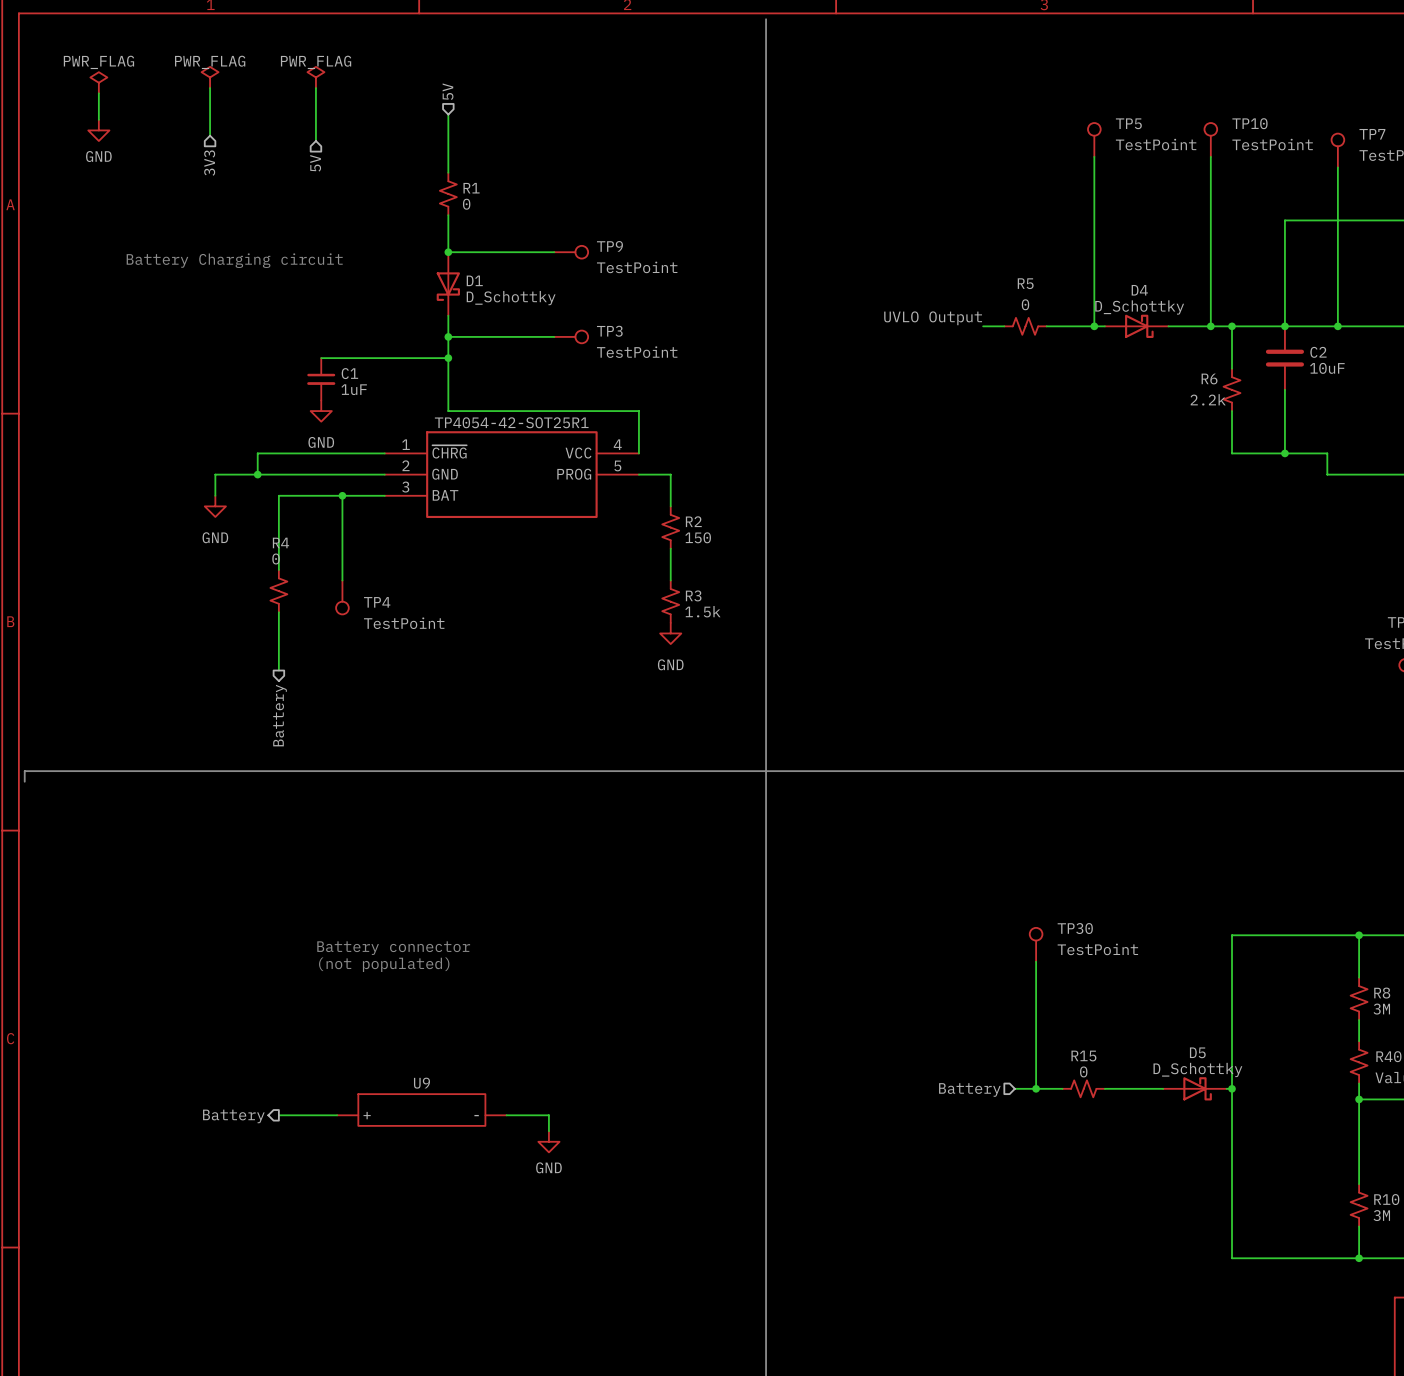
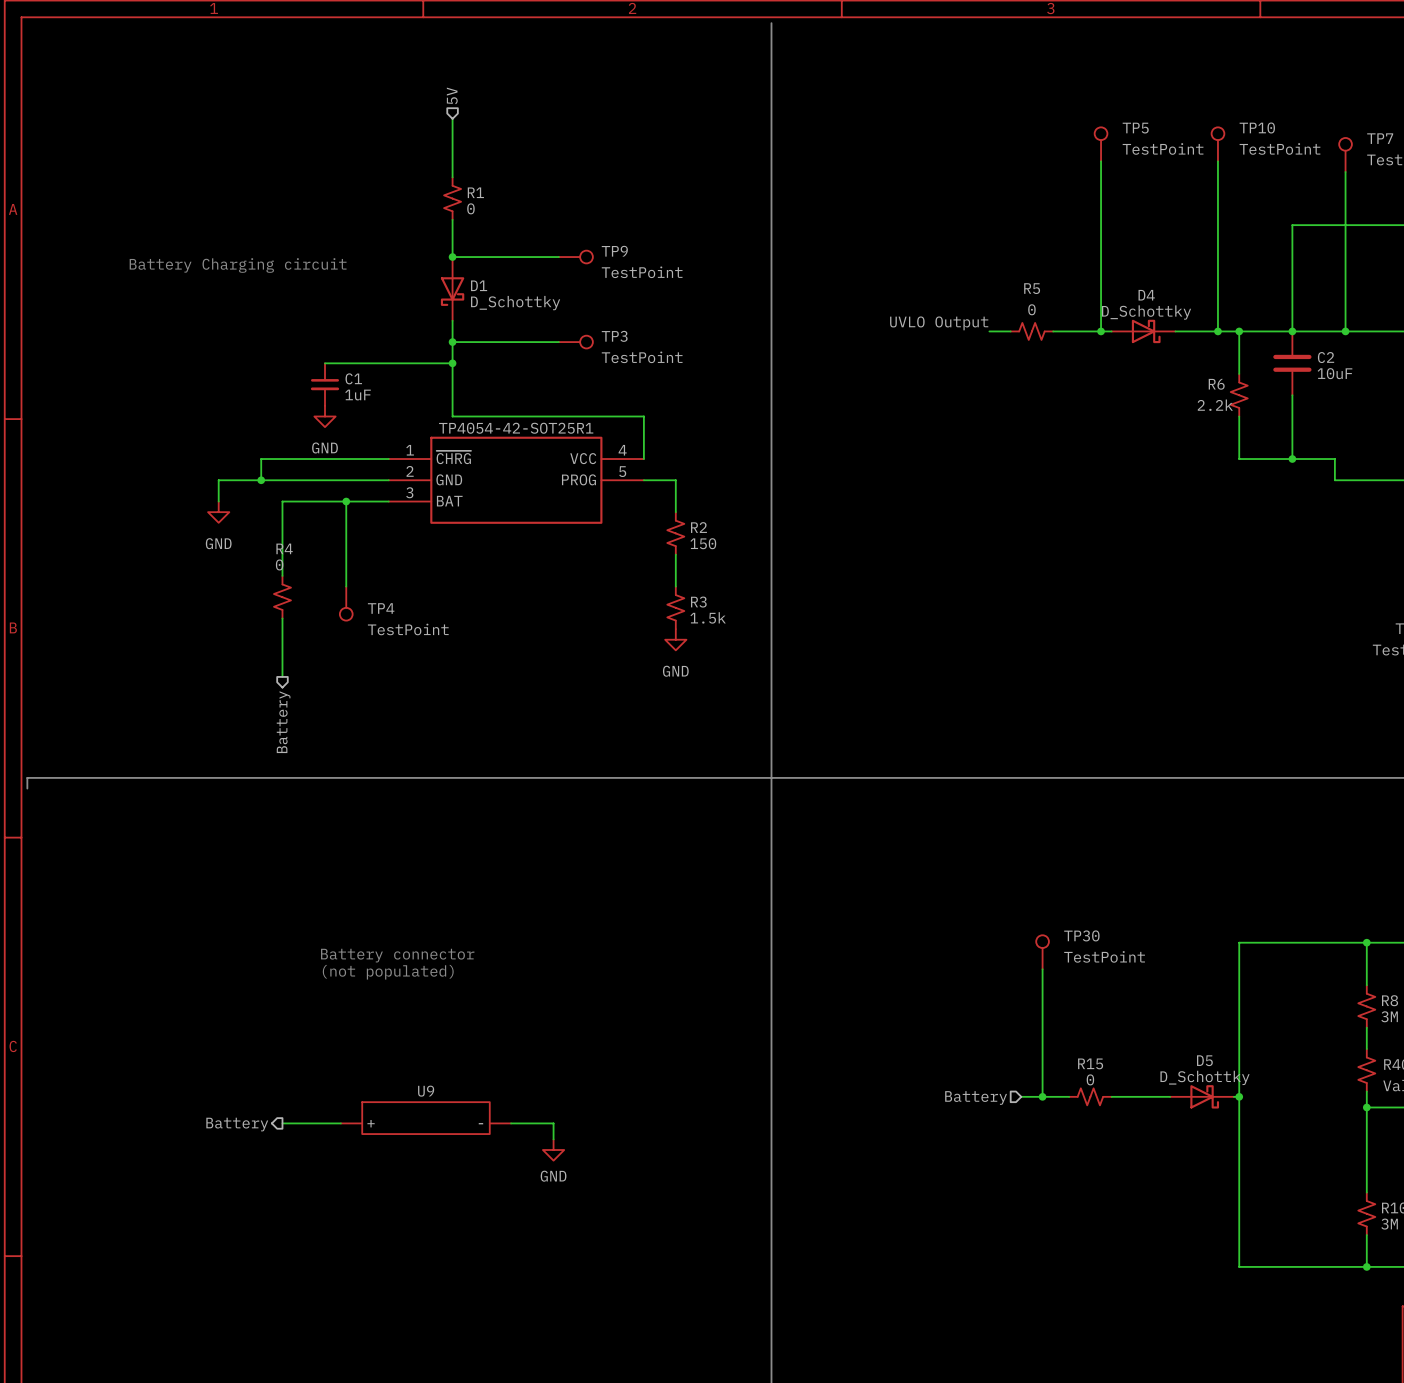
power symbol: PWR_FLAG (210, 77) -> none
power symbol: PWR_FLAG (315, 77) -> none
power symbol: PWR_FLAG (98, 82) -> none
wire: (210, 88) (210, 135) -> none
wire: (315, 88) (315, 141) -> none
wire: (98, 93) (98, 119) -> none
power symbol: GND (98, 130) -> none
hierarchical label: 3V3 (209, 163) -> none
hierarchical label: 5V (315, 163) -> none

